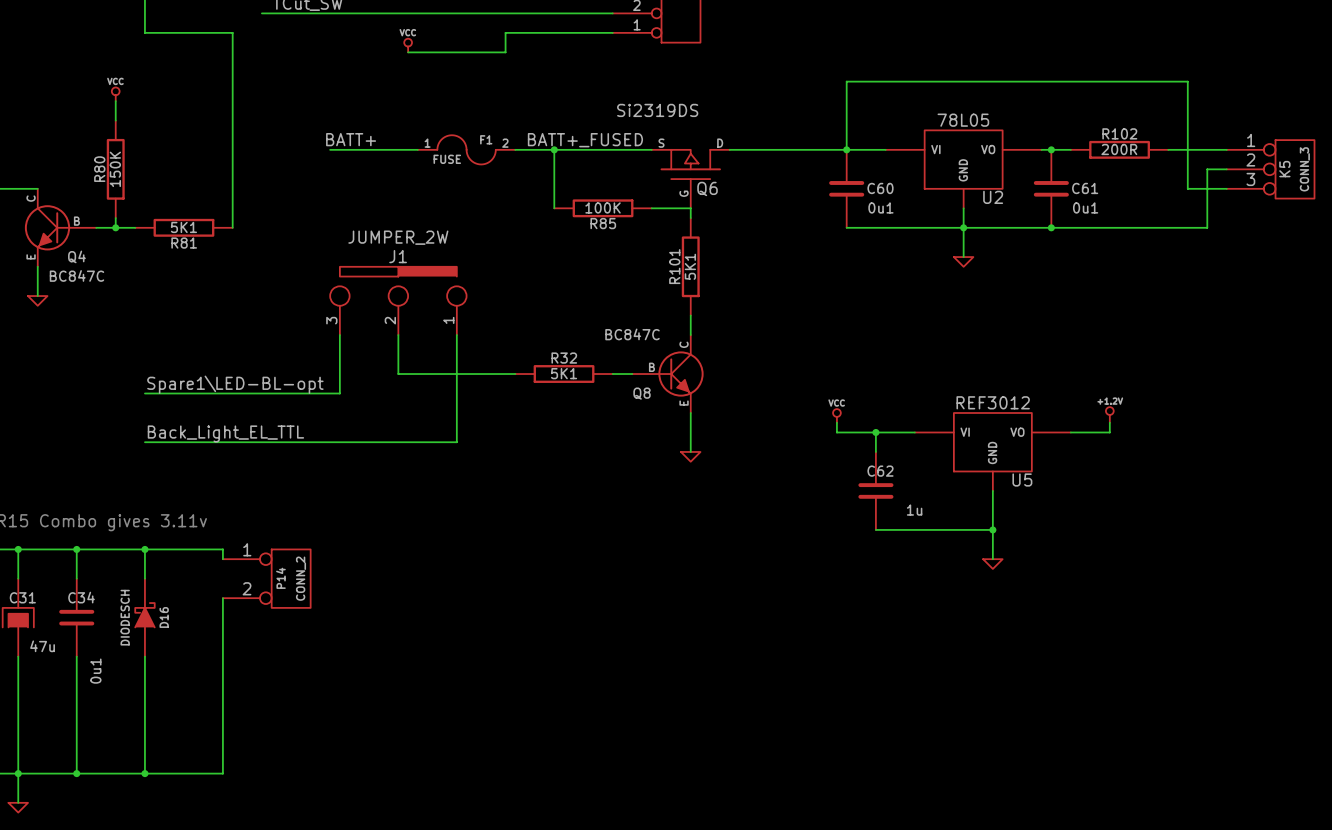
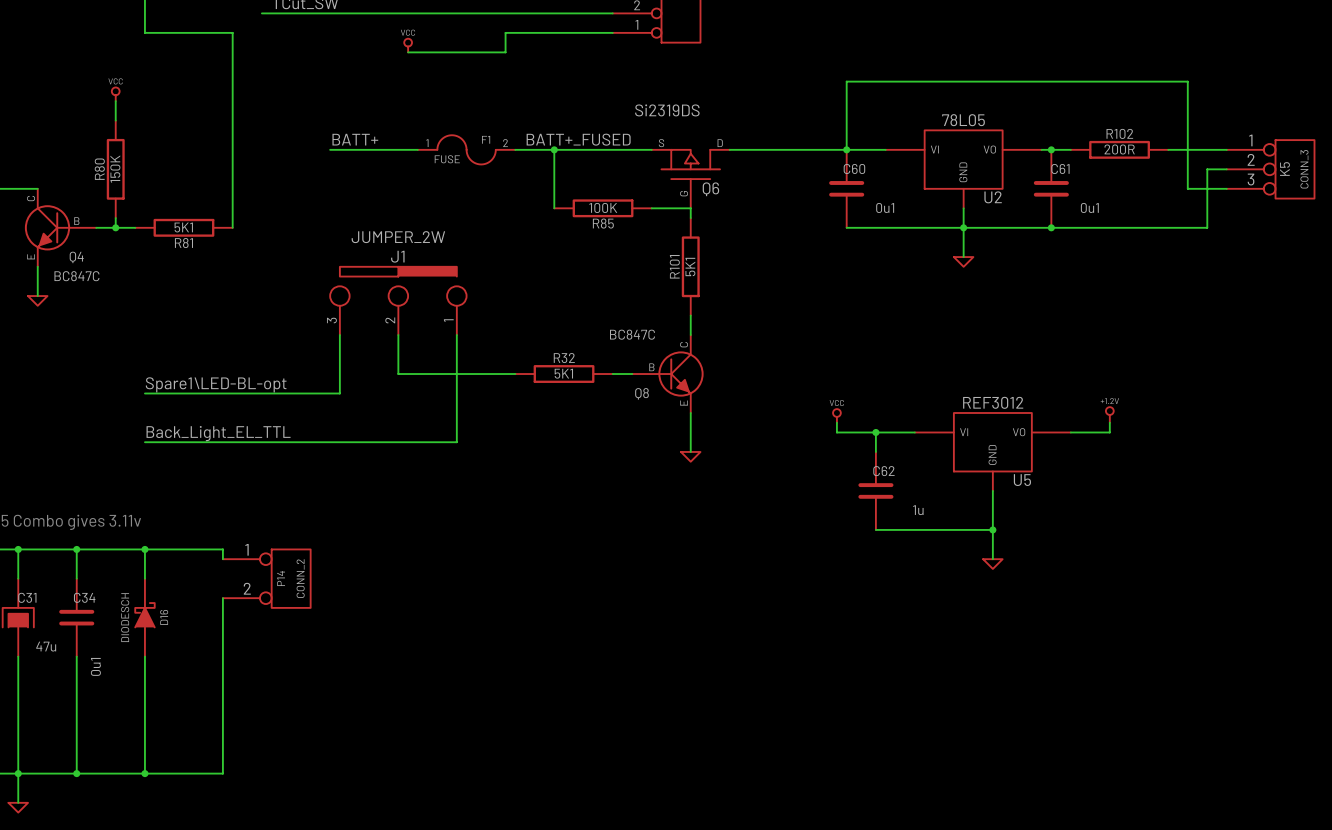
C60 name position: C60 (880, 188) -> C60 (854, 168)
C61 name position: C61 (1085, 188) -> C61 (1060, 168)

